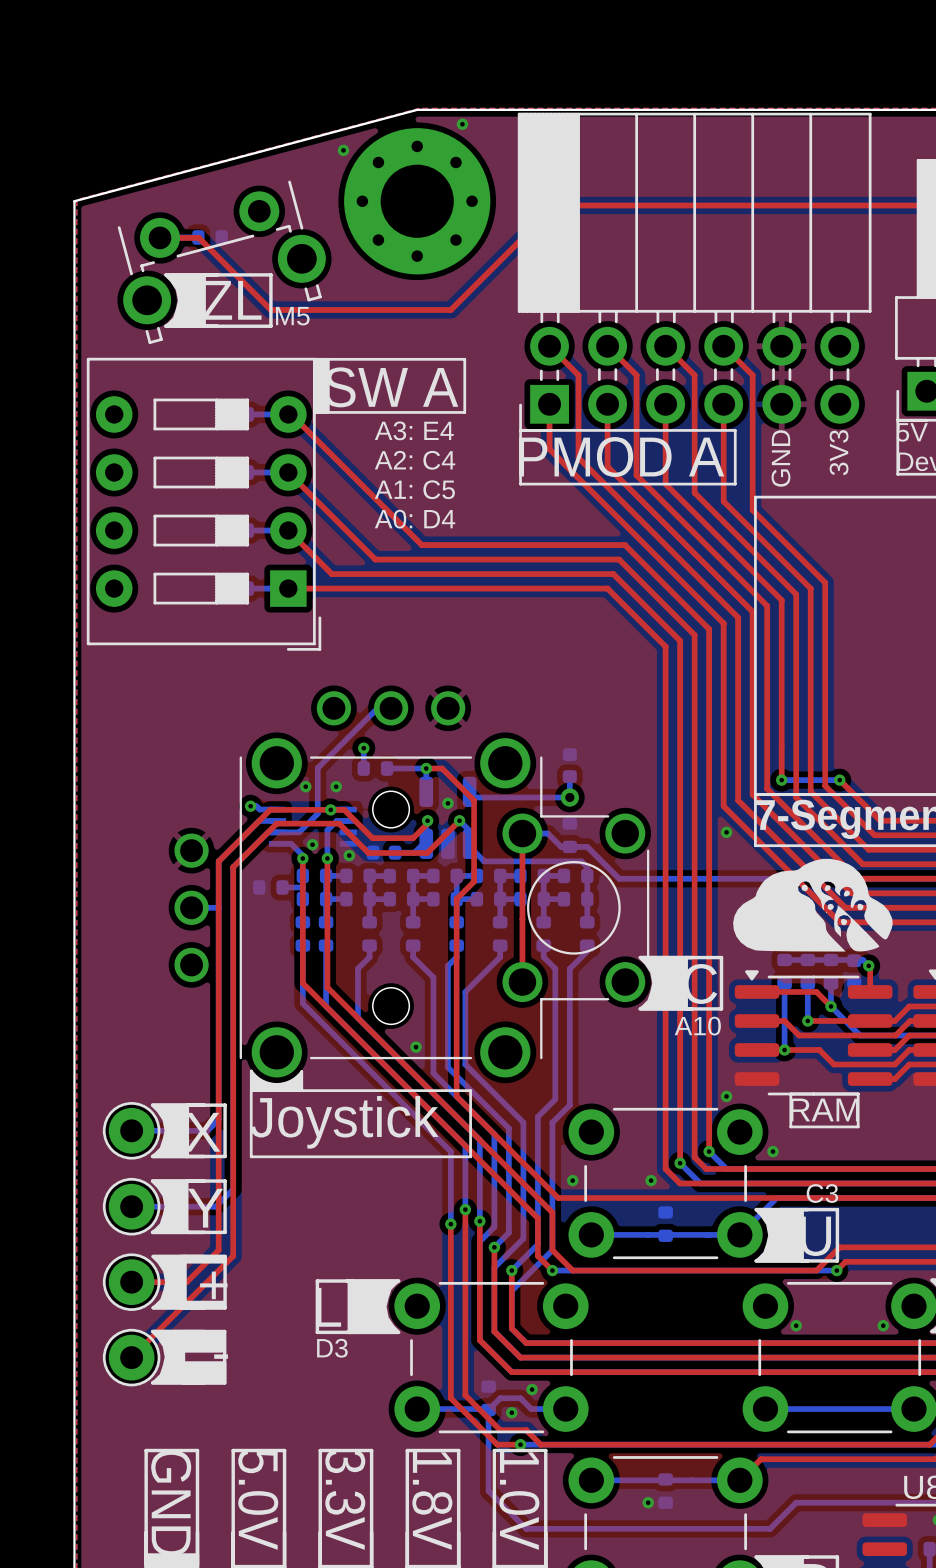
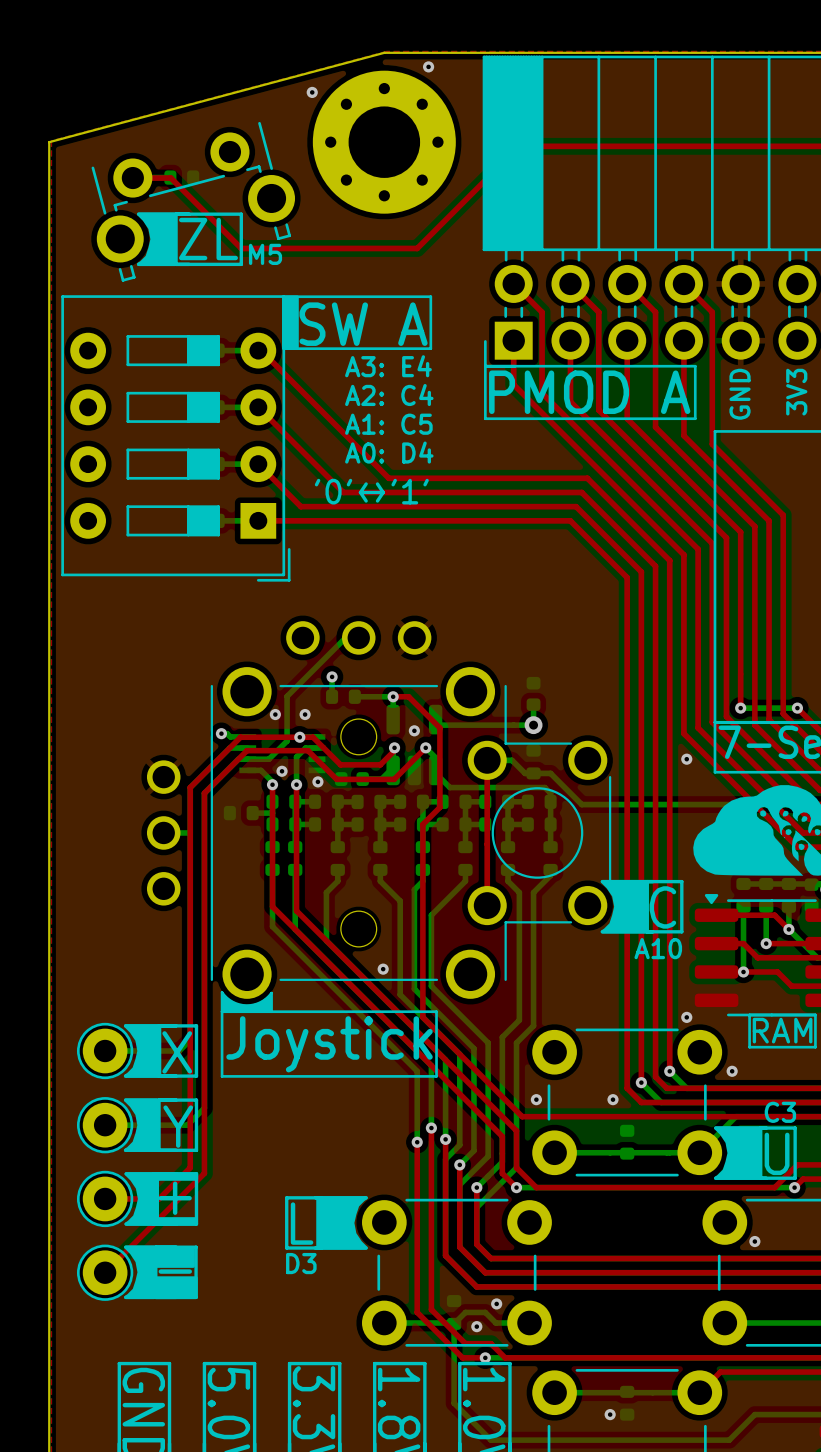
line: none -> (366, 483) (360, 492)
line: none -> (377, 483) (383, 492)
text: none -> '0' '1' (371, 491)
line: none -> (360, 492) (383, 492)
line: none -> (360, 492) (366, 501)
line: none -> (383, 492) (377, 501)

